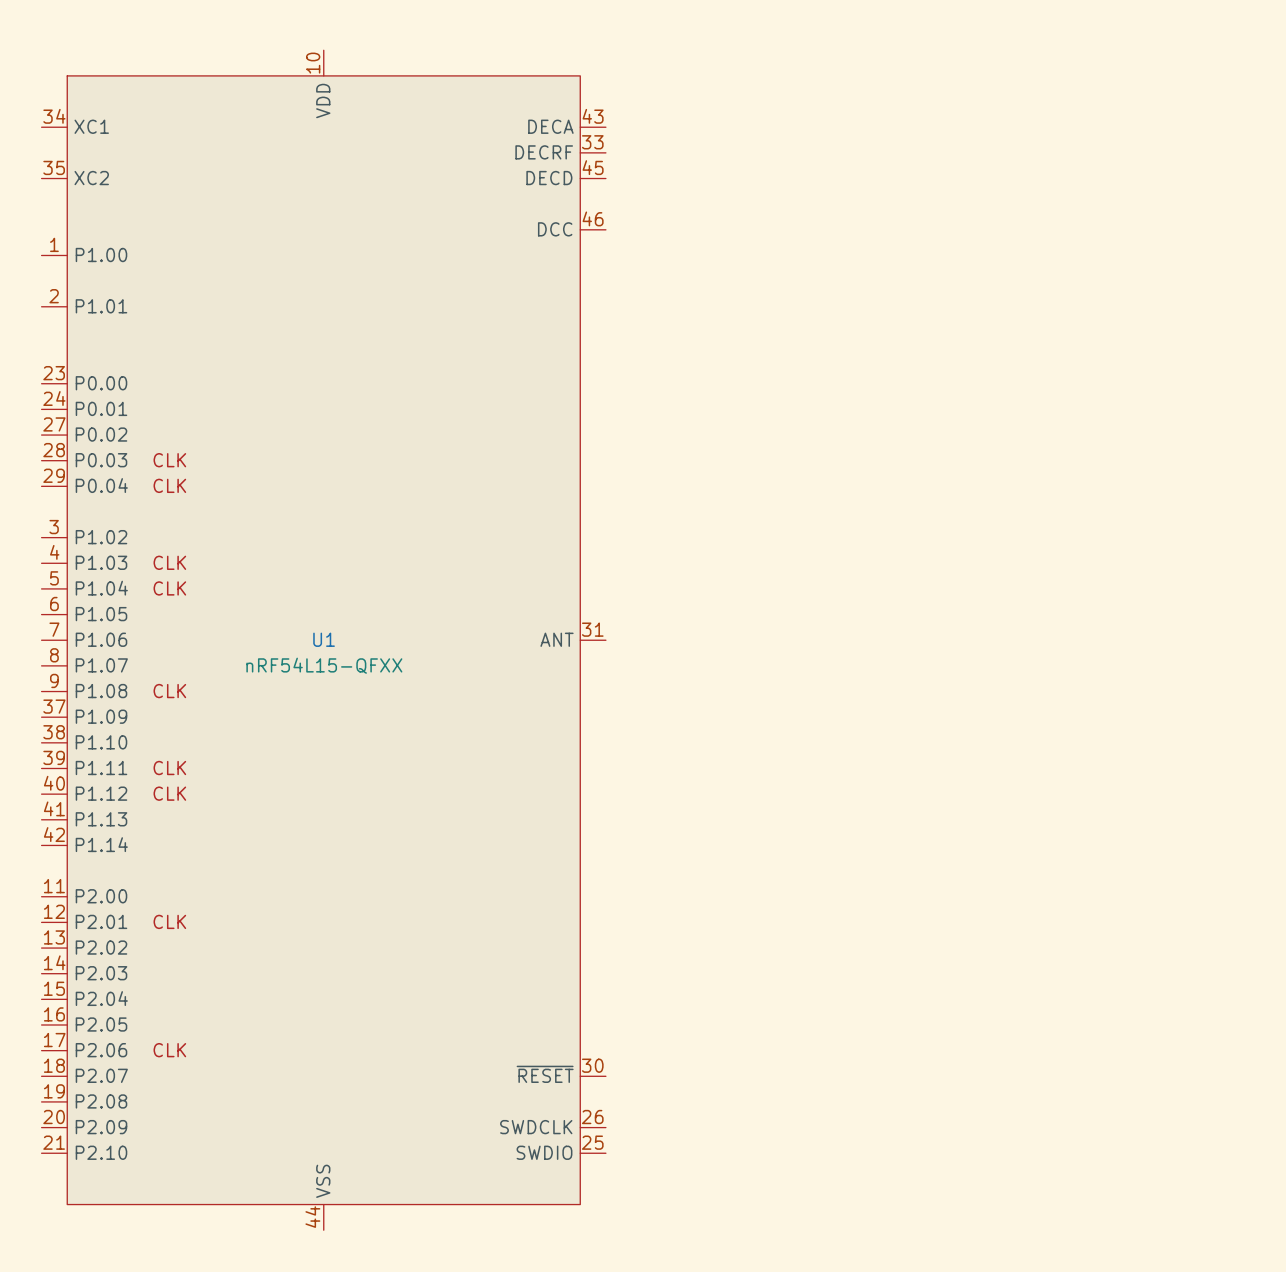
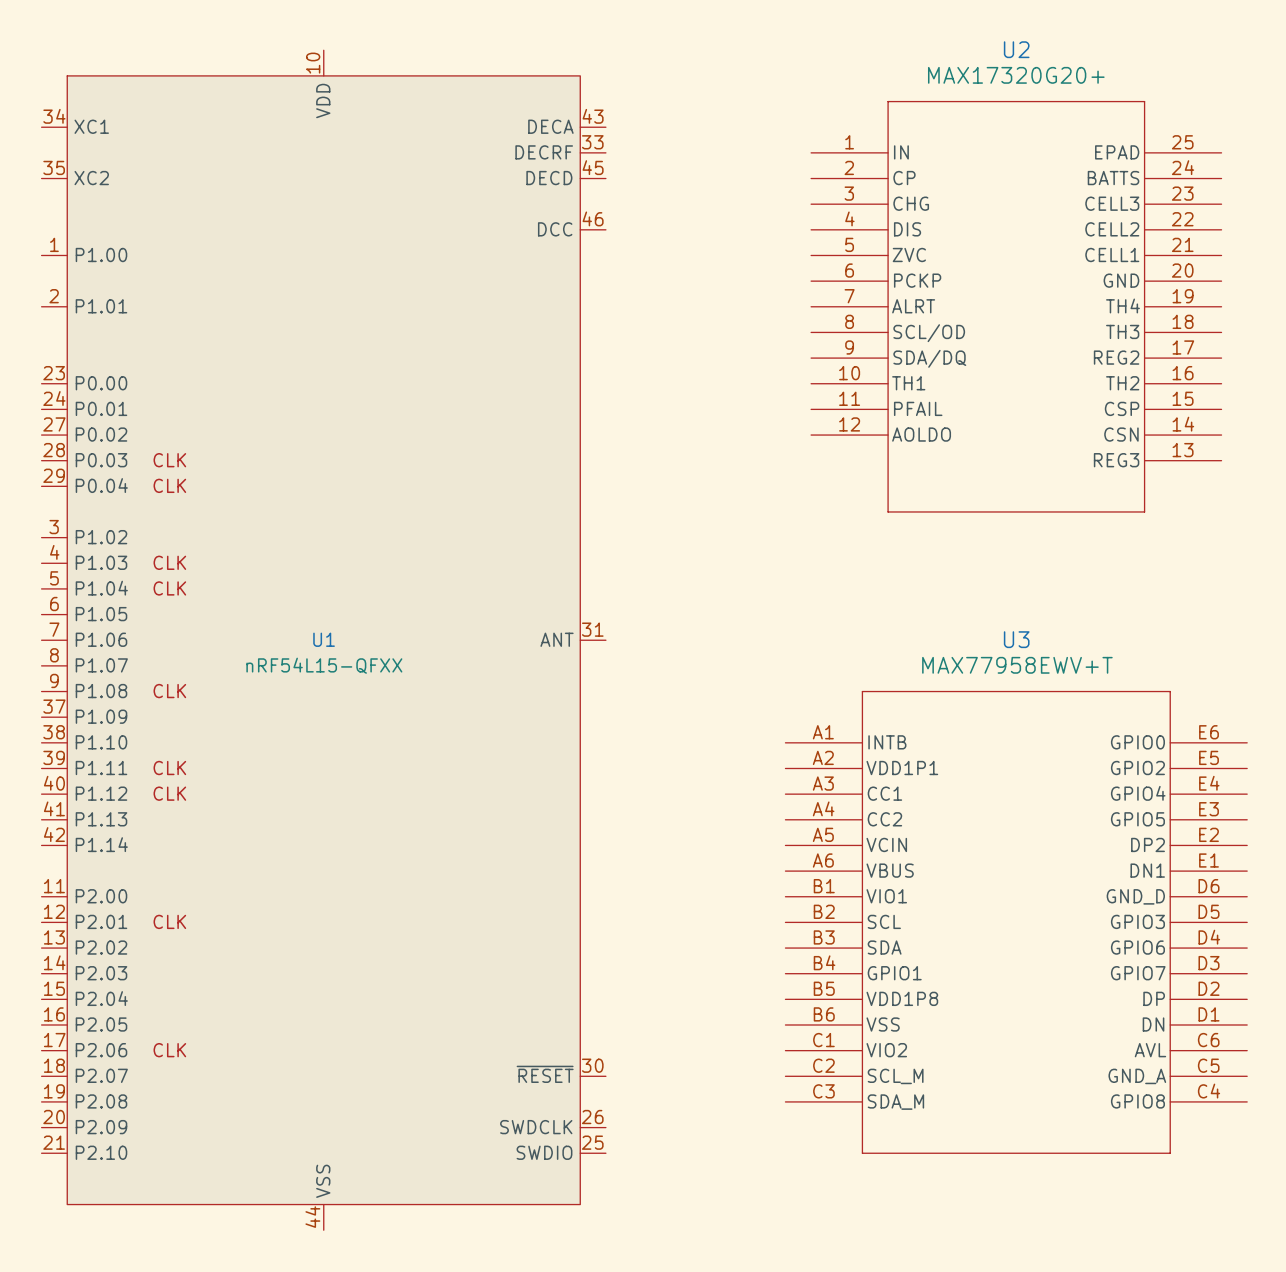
U2: none -> MAX17320G20+ (1016, 306)
U3: none -> MAX77958EWV+T (1016, 922)

